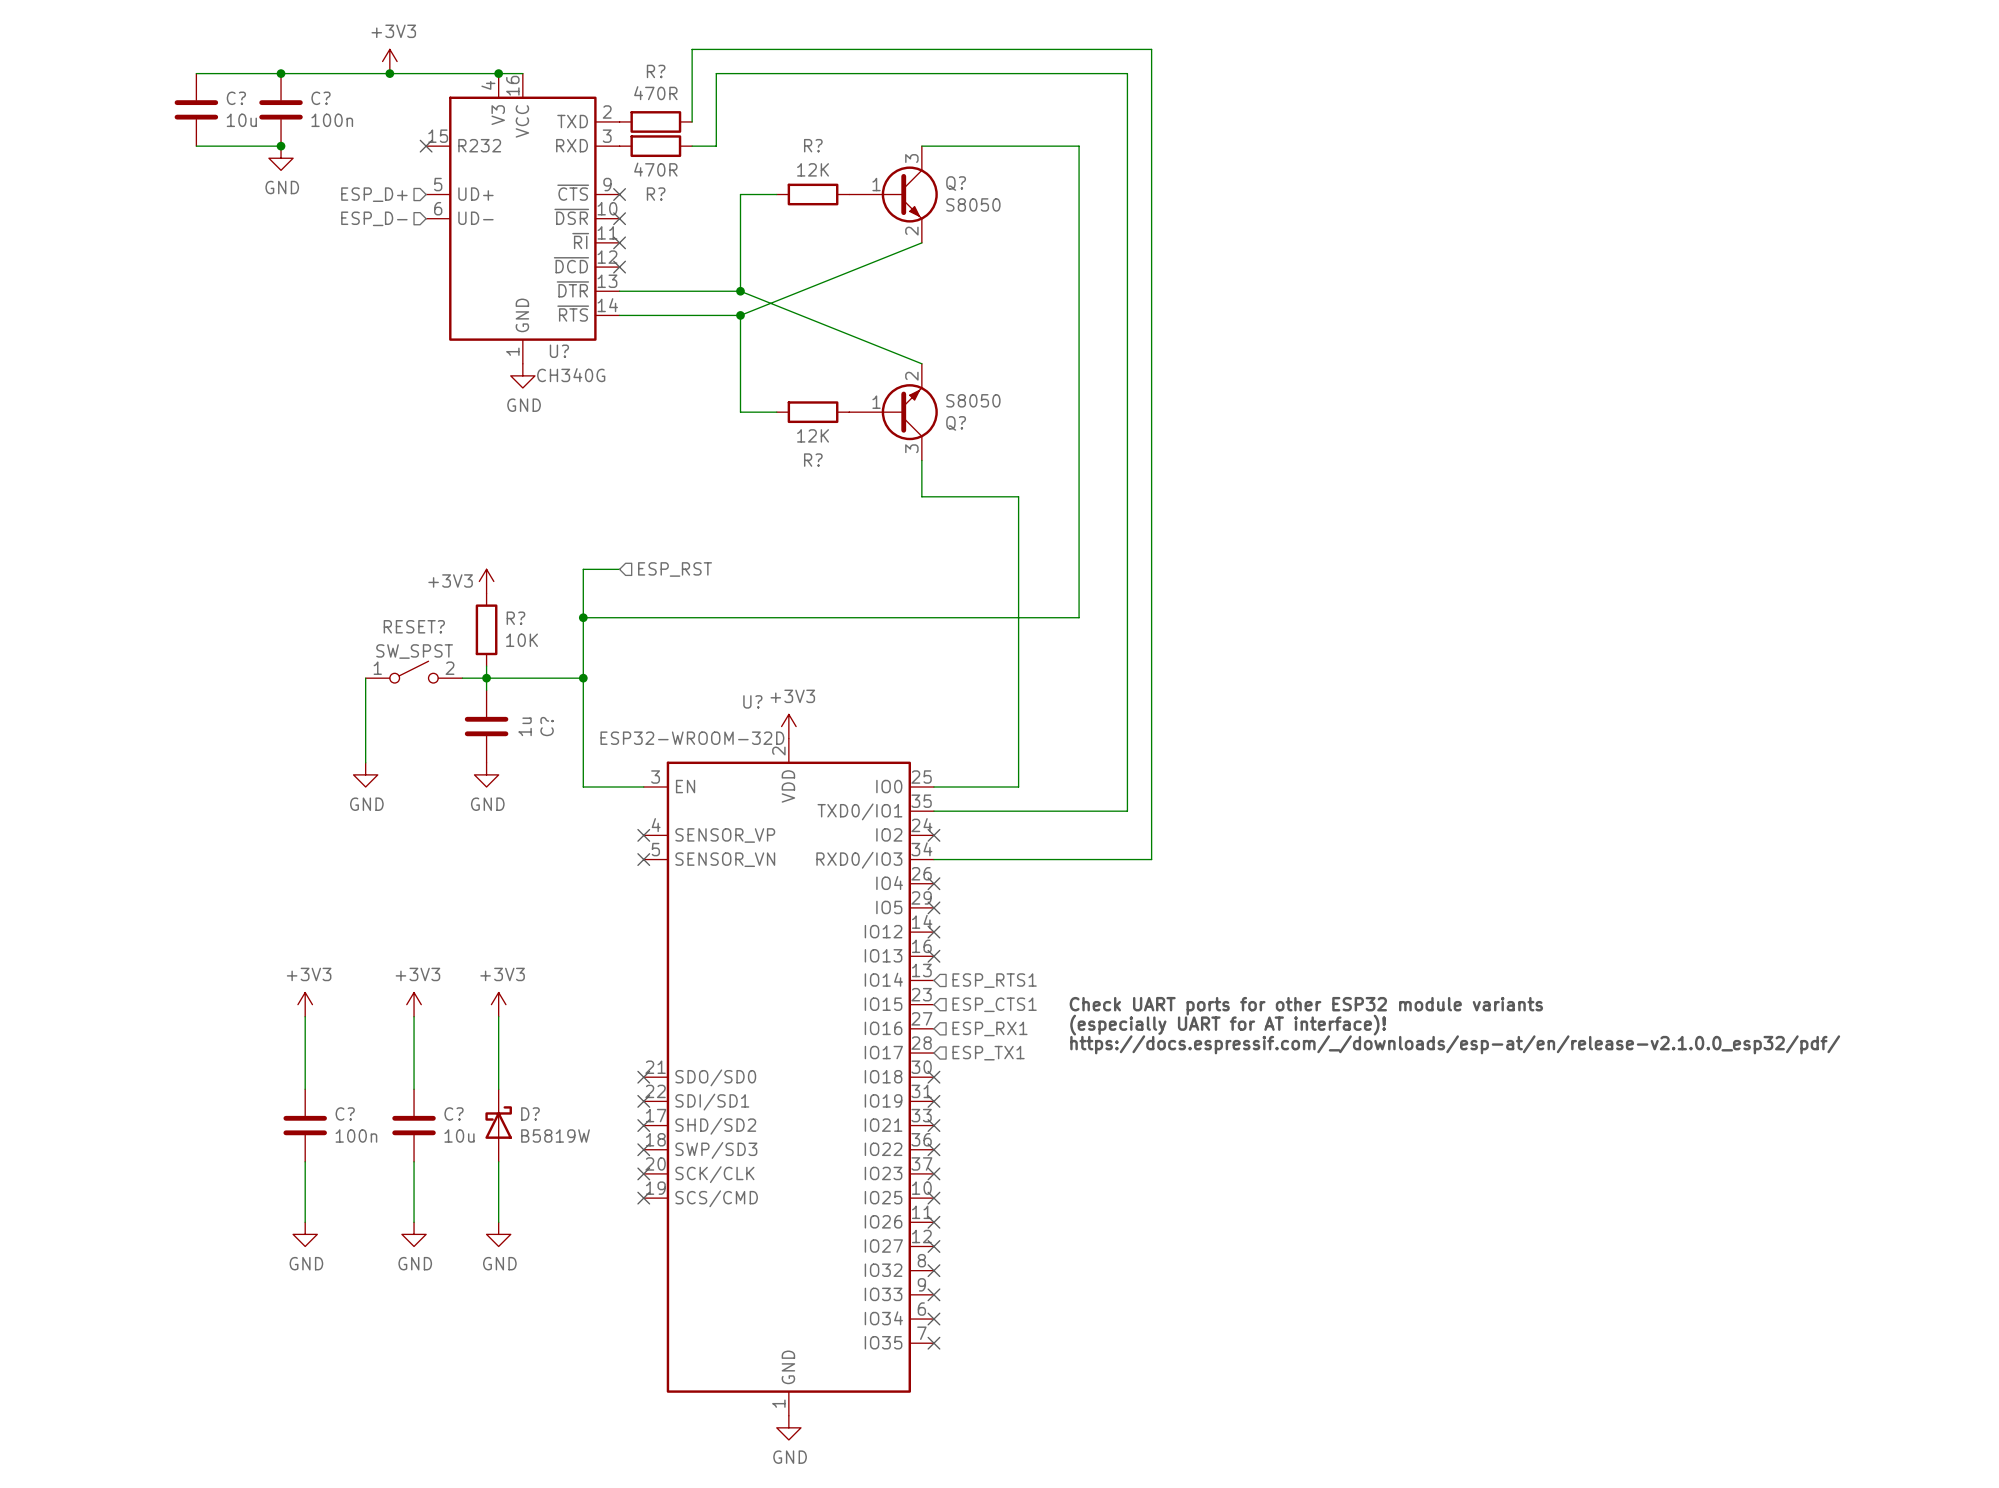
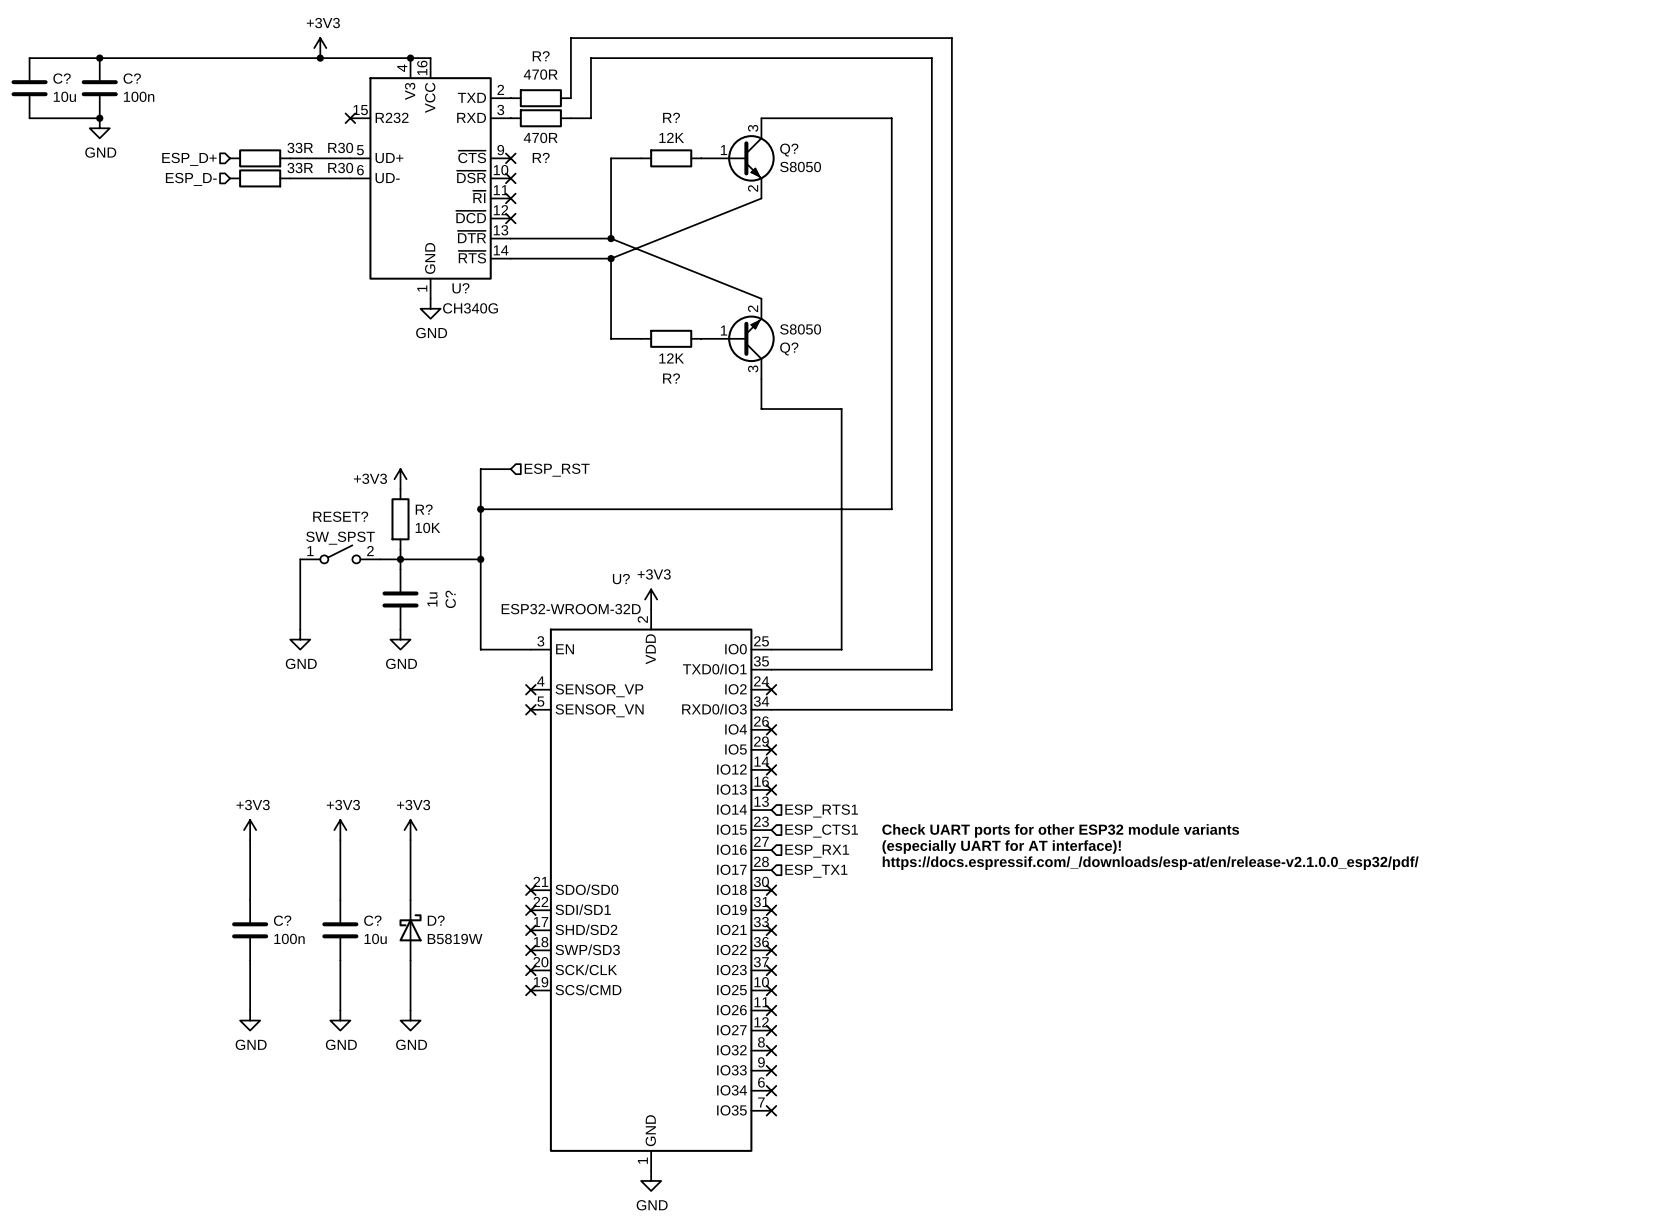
wire: none -> (29, 58) (159, 58)
junction: none -> (99, 58)
junction: (281, 73) -> none
C? position: (196, 109) -> (29, 88)
C? position: (281, 109) -> (99, 88)
junction: none -> (99, 118)
wire: (196, 146) (281, 146) -> (29, 118) (99, 118)
junction: (281, 146) -> none
power symbol position: GND (281, 158) -> GND (99, 128)
R30: none -> 33R (260, 158)
wire: none -> (290, 158) (350, 158)
hierarchical label position: ESP_D+ (374, 194) -> ESP_D+ (189, 159)
R30: none -> 33R (260, 178)
wire: none -> (290, 178) (350, 178)
hierarchical label position: ESP_D- (374, 218) -> ESP_D- (191, 179)

